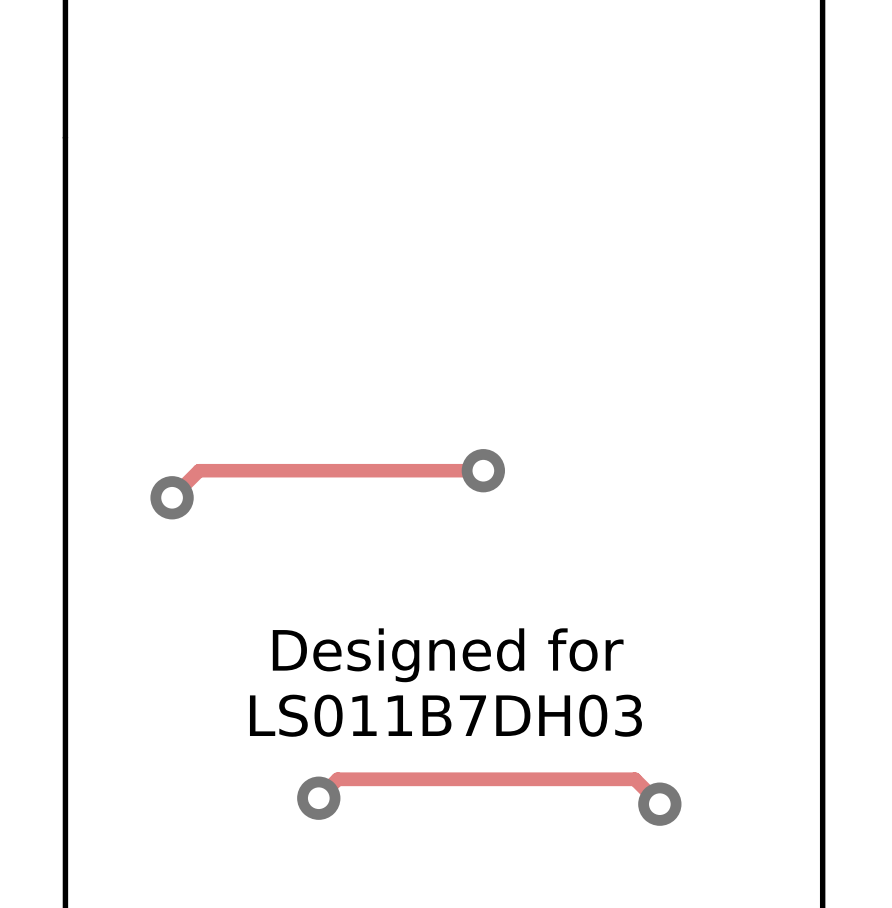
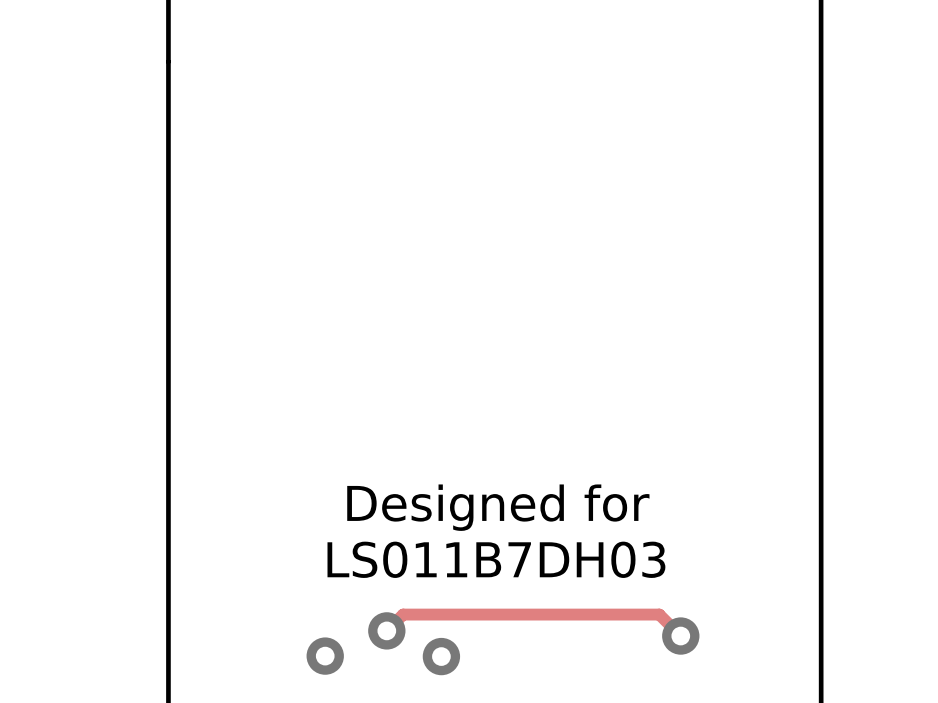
track: (483, 470) (199, 470) (172, 497) -> none
via: (483, 470) -> none
via: (172, 497) -> none
via: none -> (325, 656)
via: none -> (441, 656)

